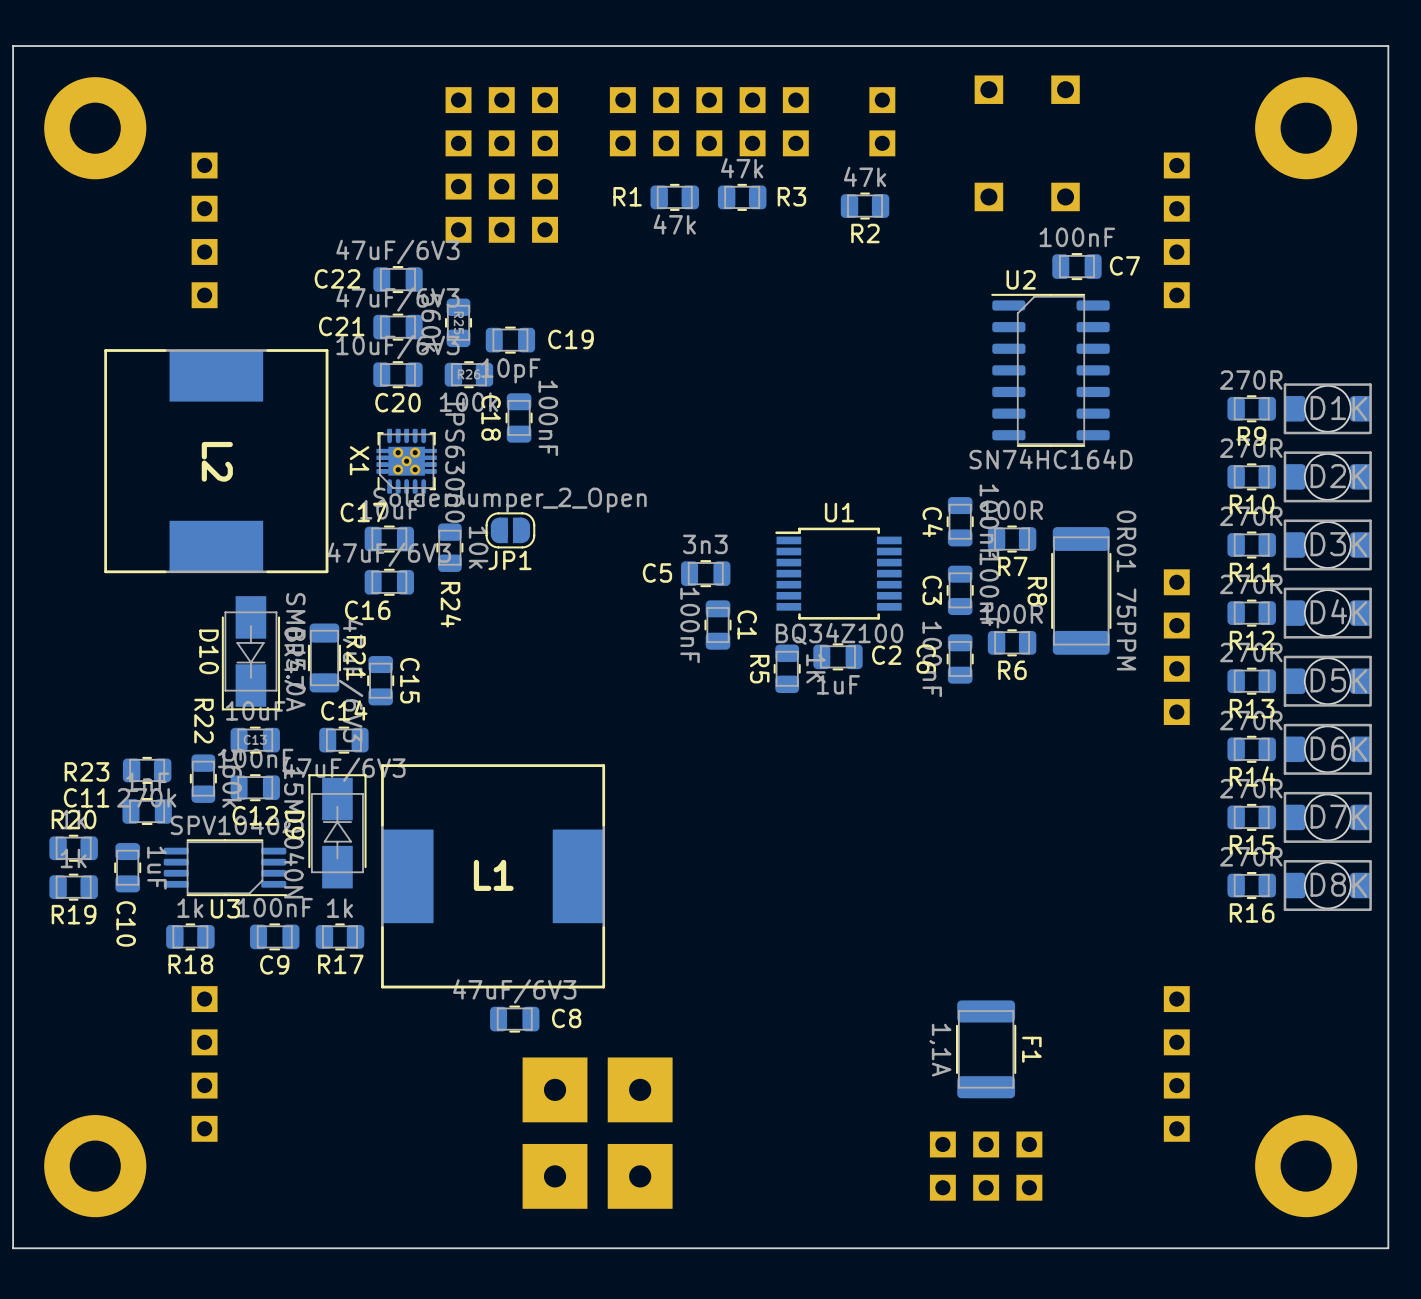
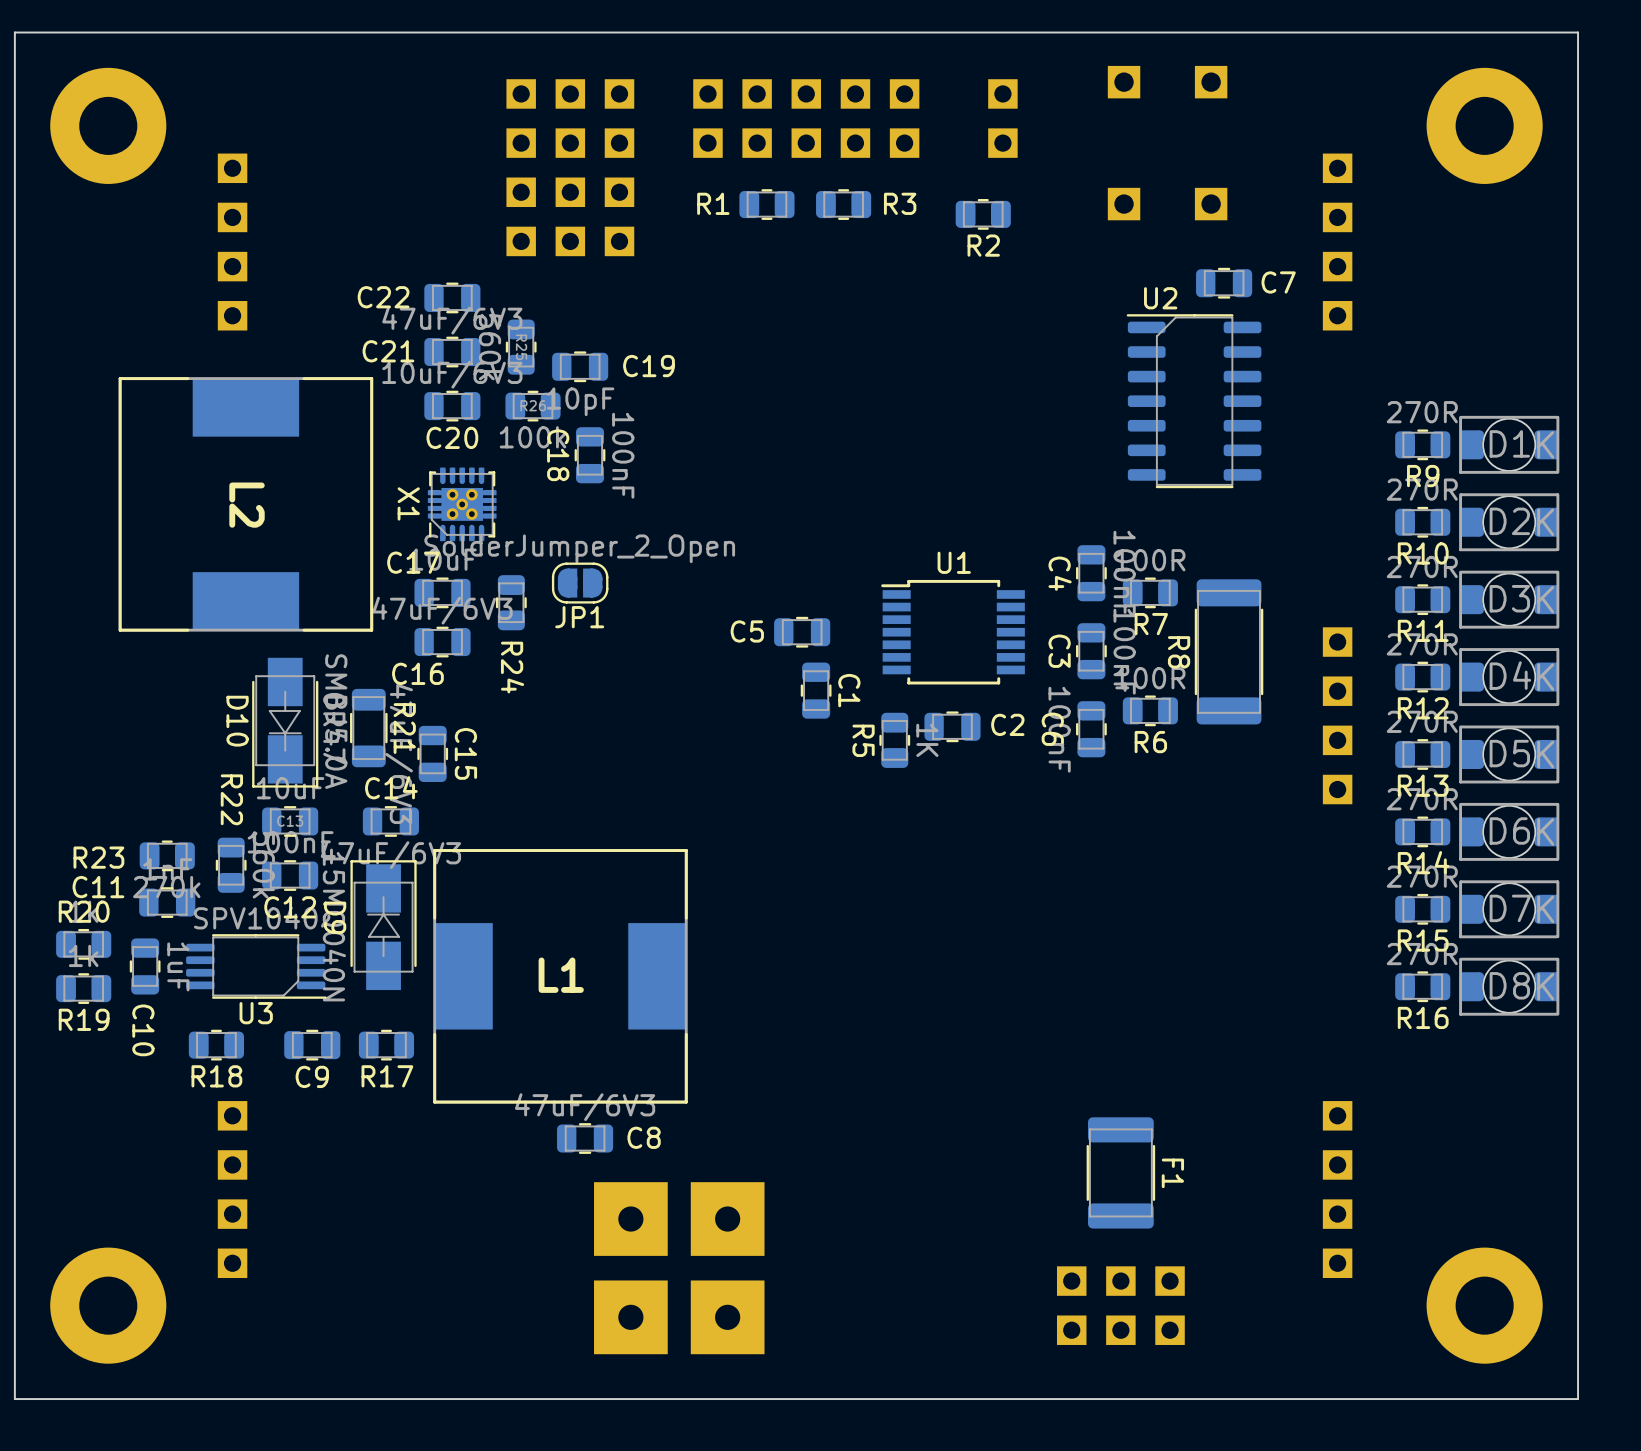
R3 value: 47k (742, 168) -> none
R2 value: 47k (865, 176) -> none
R1 value: 47k (674, 224) -> none
C7 value: 100nF (1077, 237) -> none
C22 value: 47uF/6V3 (397, 251) -> none
U2 value: SN74HC164D (1051, 459) -> none
X1 value: TPS63060 (454, 460) -> none
C5 value: 3n3 (705, 544) -> none
R24 value: 10k (478, 547) -> none
R8 value: 0R01 75PPM (1126, 590) -> none
C1 value: 100nF (690, 625) -> none
U1 value: BQ34Z100 (839, 633) -> none
C2 value: 1uF (838, 684) -> none
C9 value: 100nF (275, 907) -> none
R18 value: 1k (190, 908) -> none
R17 value: 1k (340, 908) -> none
F1 value: 1,1A (940, 1050) -> none

